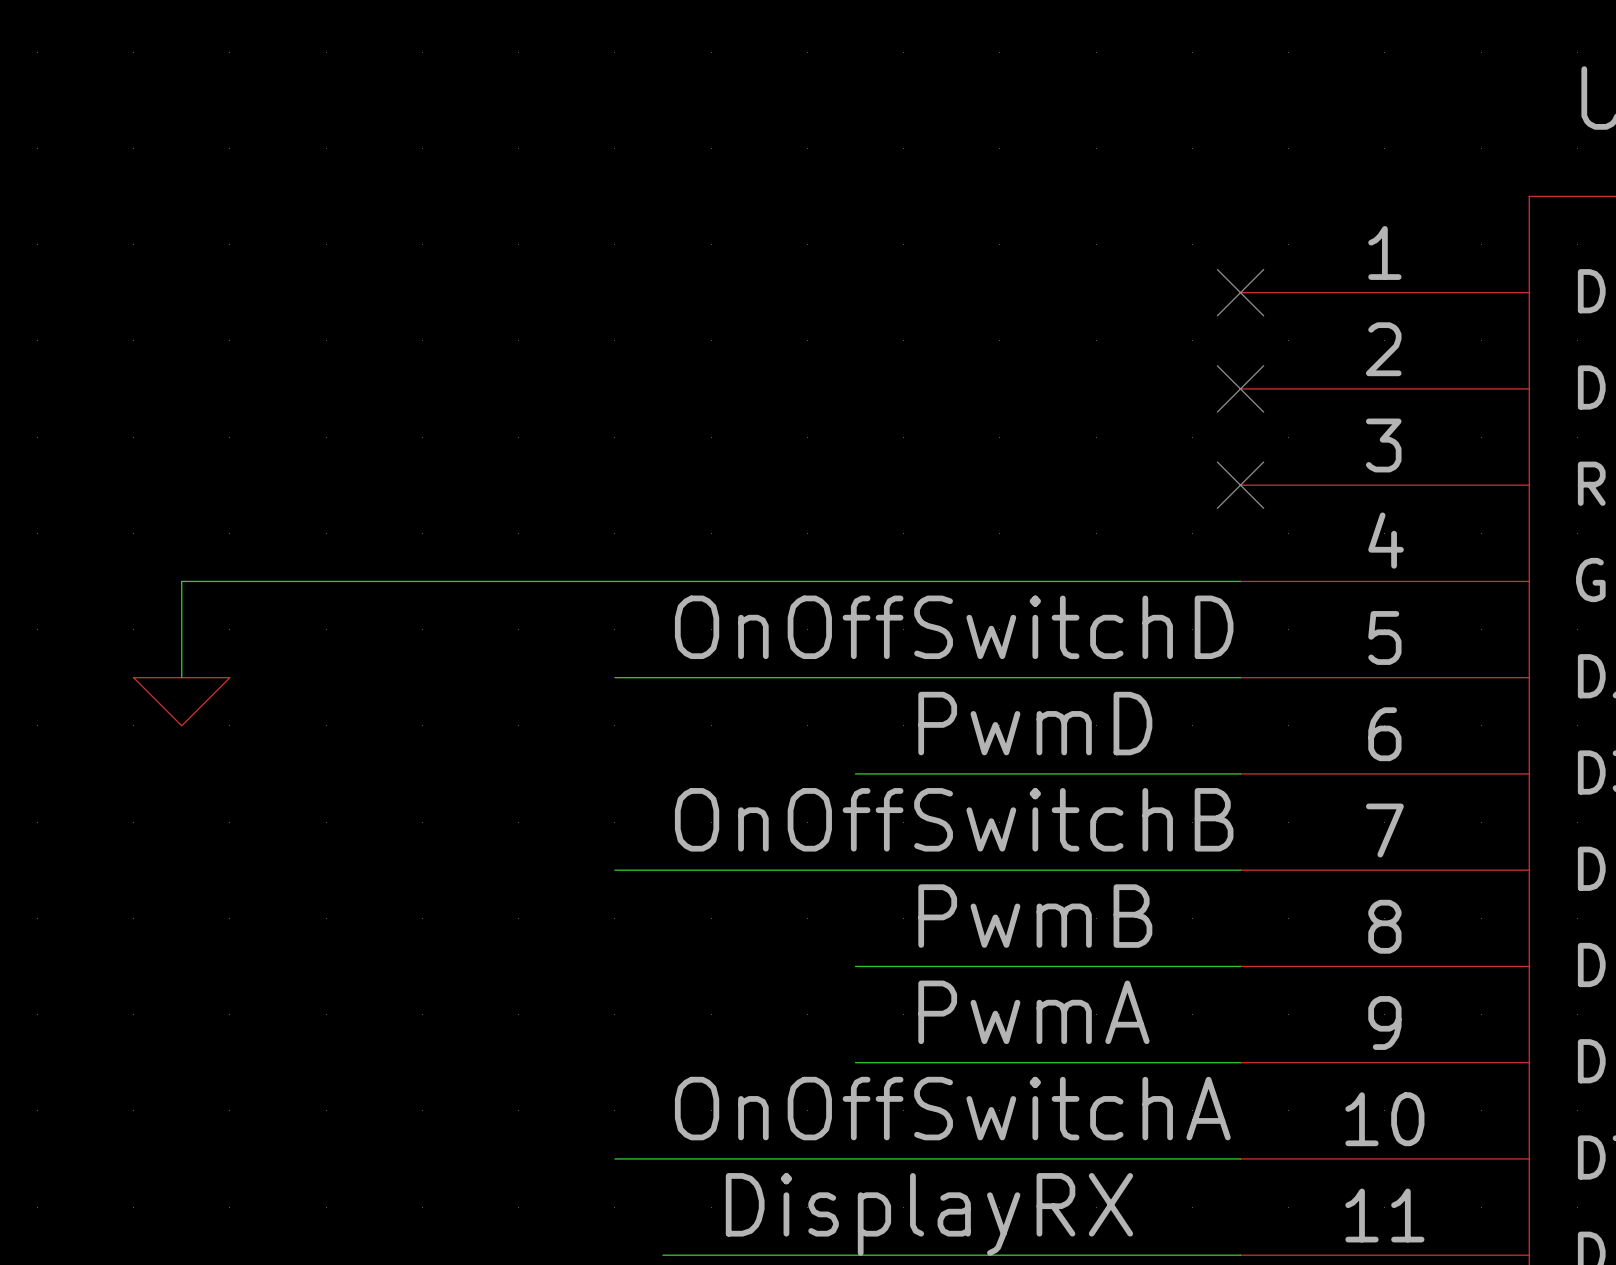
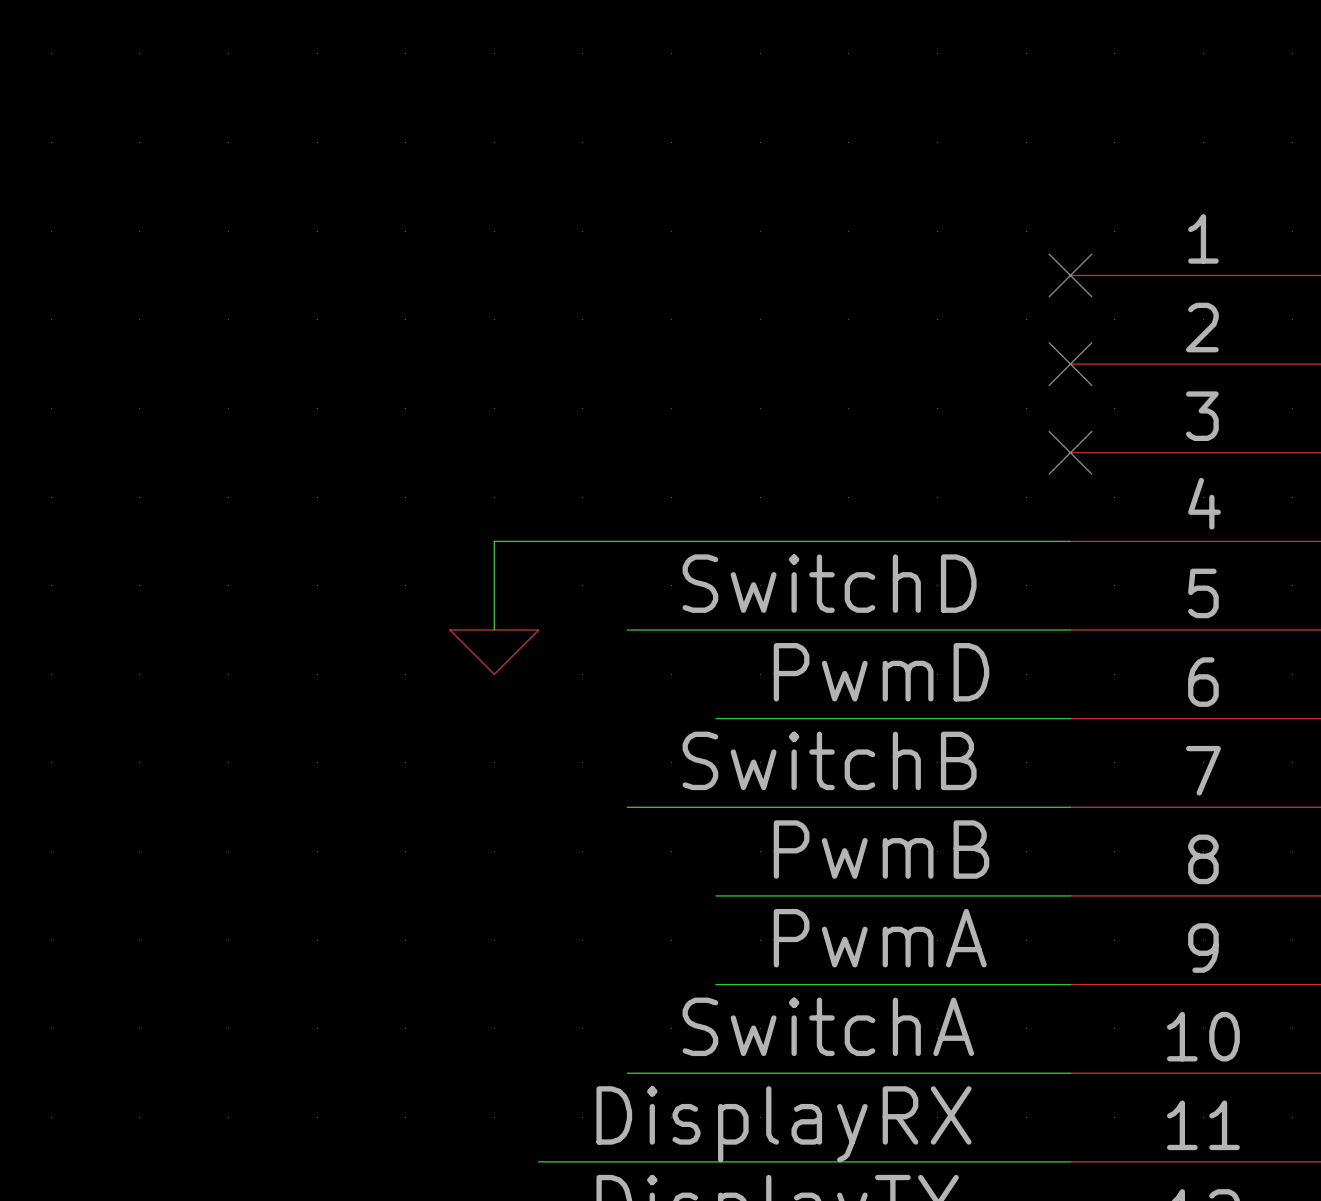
wire: (614, 581) (181, 581) (181, 677) -> none
label: OnOffSwitchD (954, 627) -> SwitchD (829, 583)
wire: (614, 677) (759, 677) -> (494, 630) (494, 541)
power symbol position: (181, 701) -> (494, 652)
label: OnOffSwitchB (954, 819) -> SwitchB (829, 760)
wire: (614, 870) (759, 870) -> none
label: OnOffSwitchA (952, 1108) -> SwitchA (828, 1026)
wire: (614, 1158) (759, 1158) -> none

